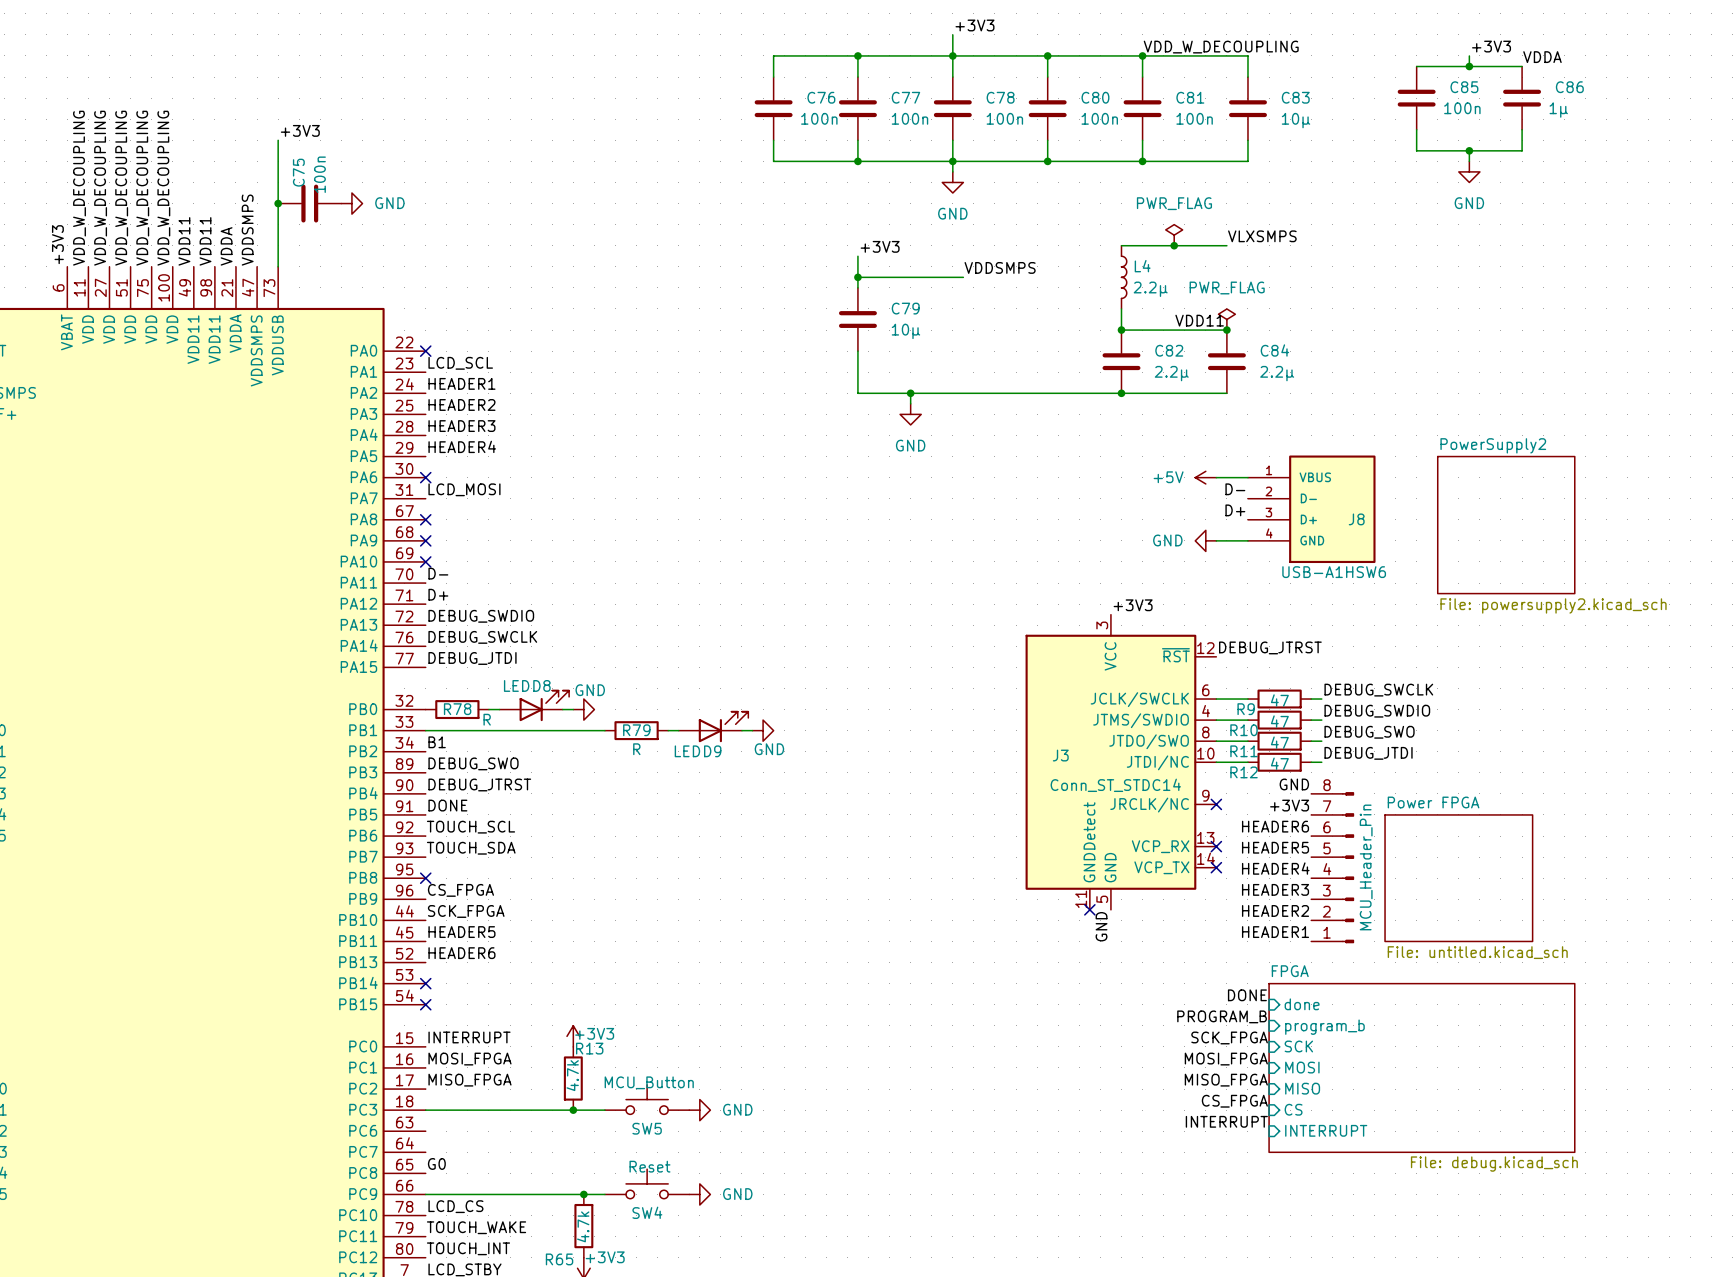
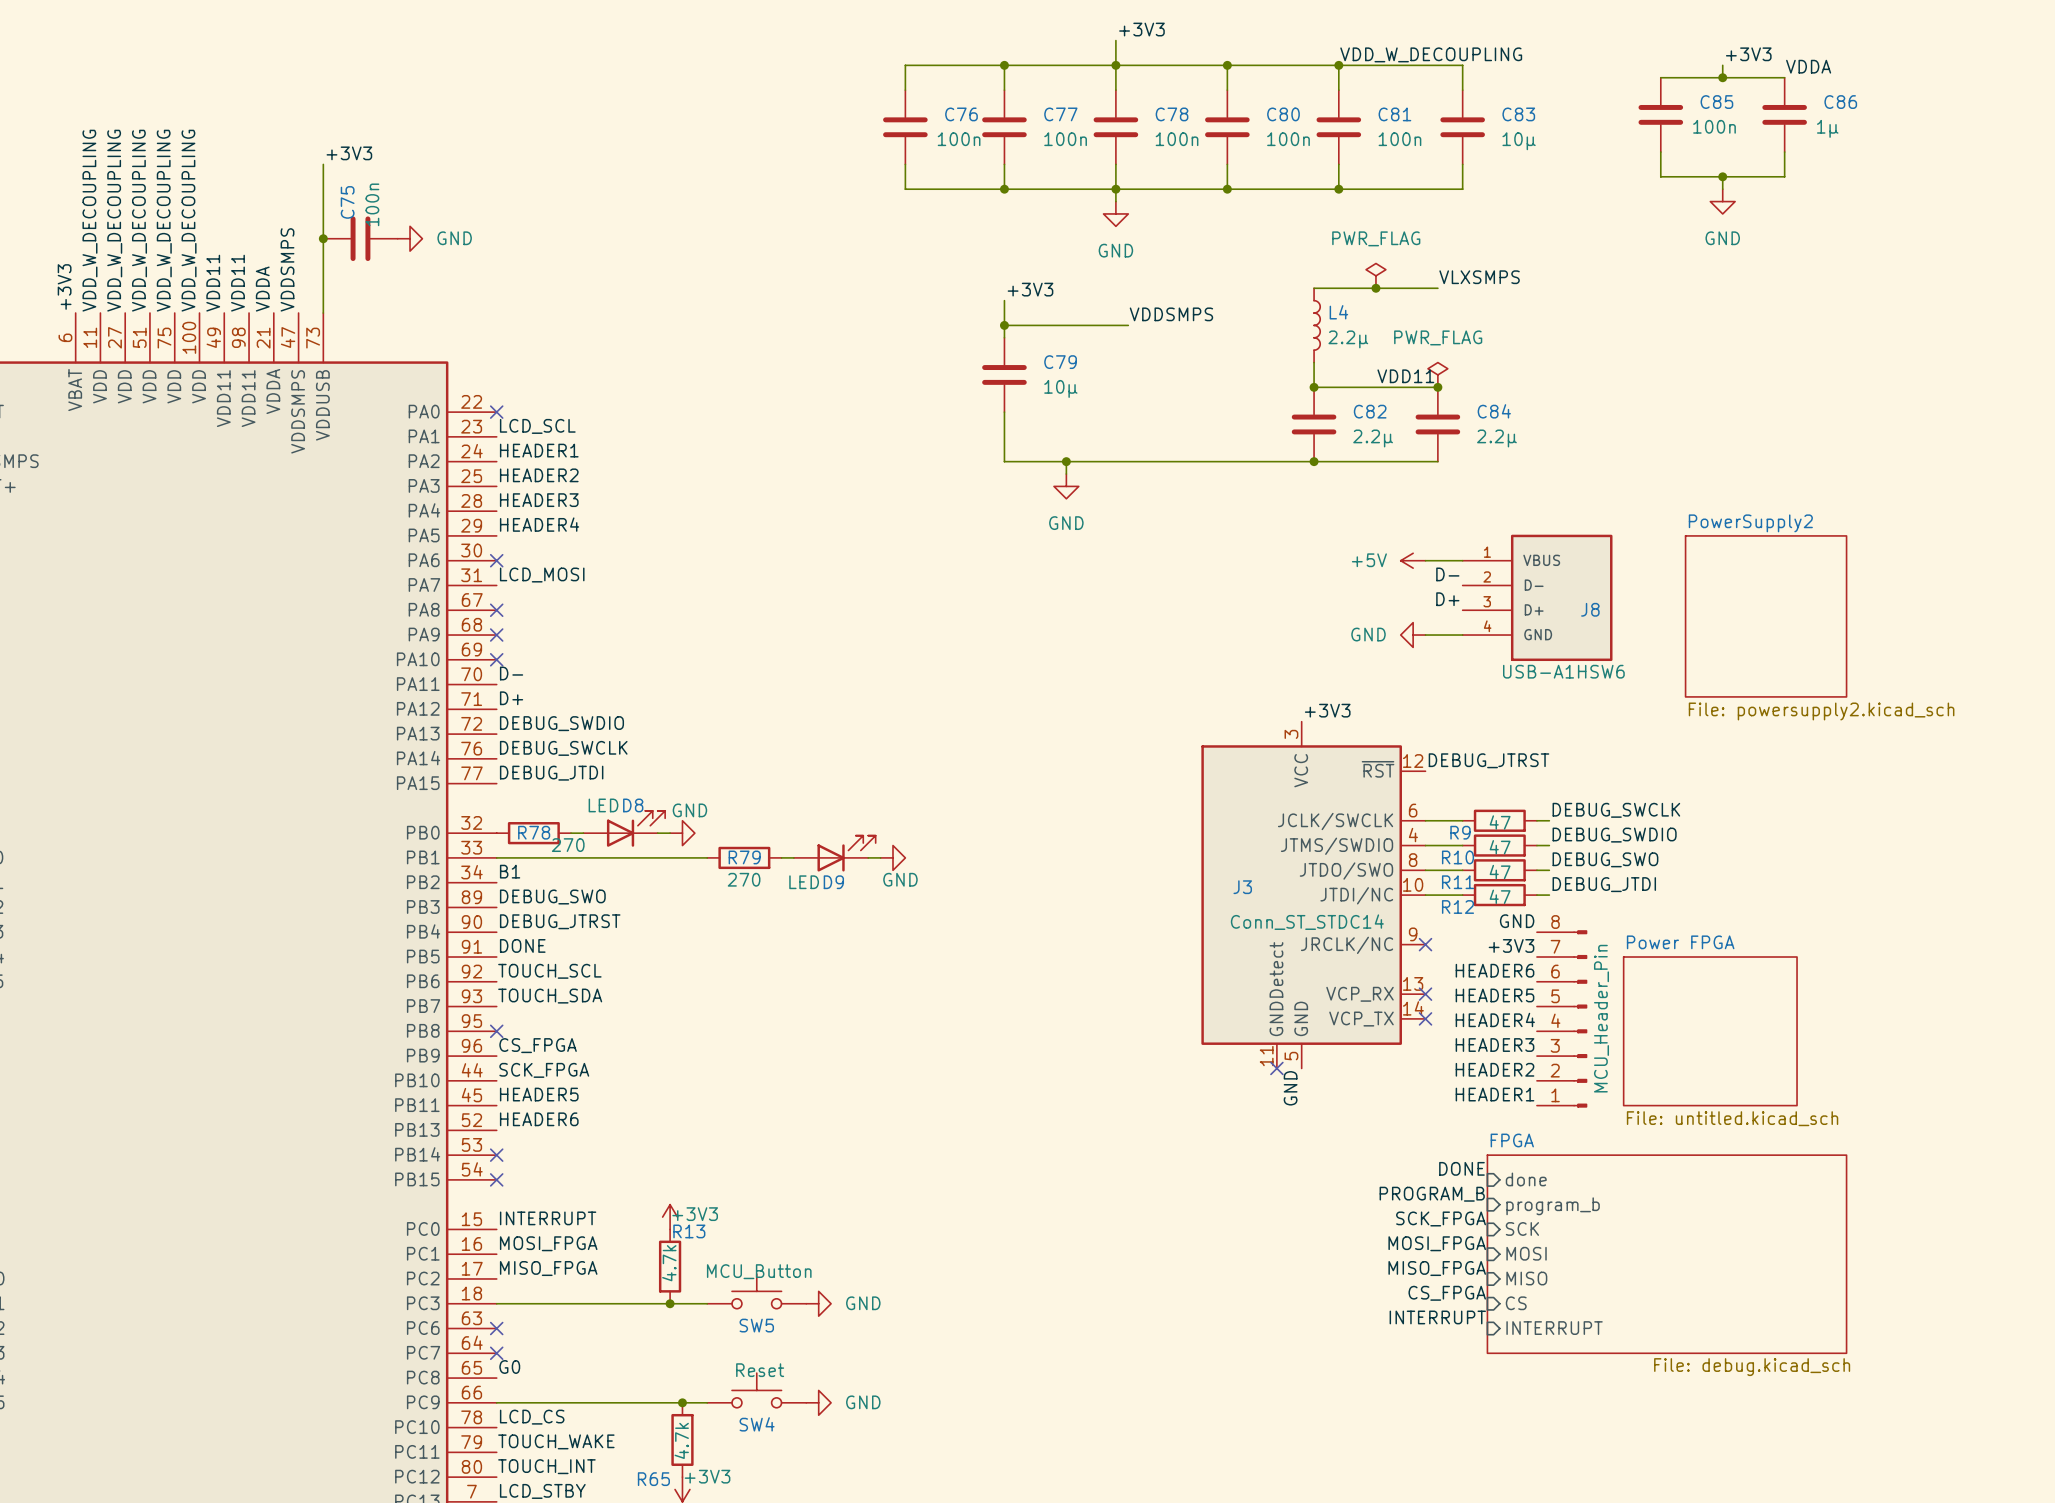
R78 value: R (487, 719) -> 270 (568, 845)
R79 value: R (636, 749) -> 270 (744, 879)
no-connect mark: none -> (496, 1328)
no-connect mark: none -> (496, 1353)

